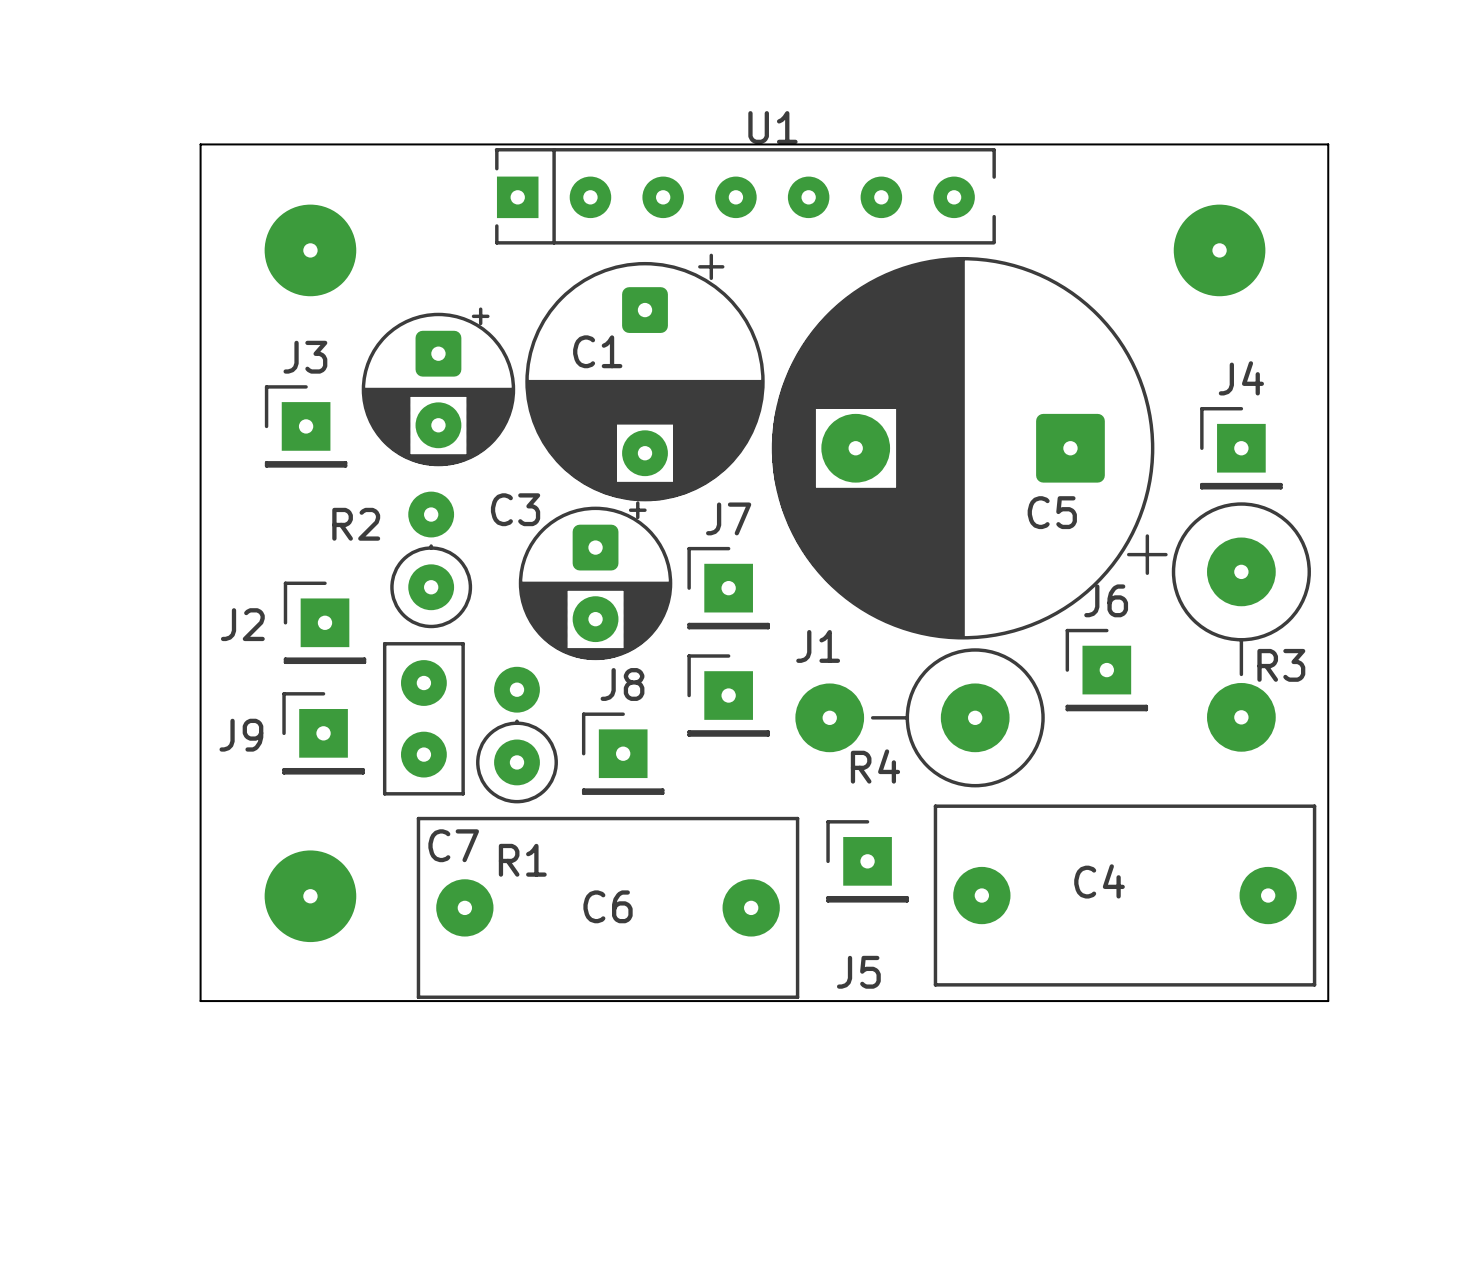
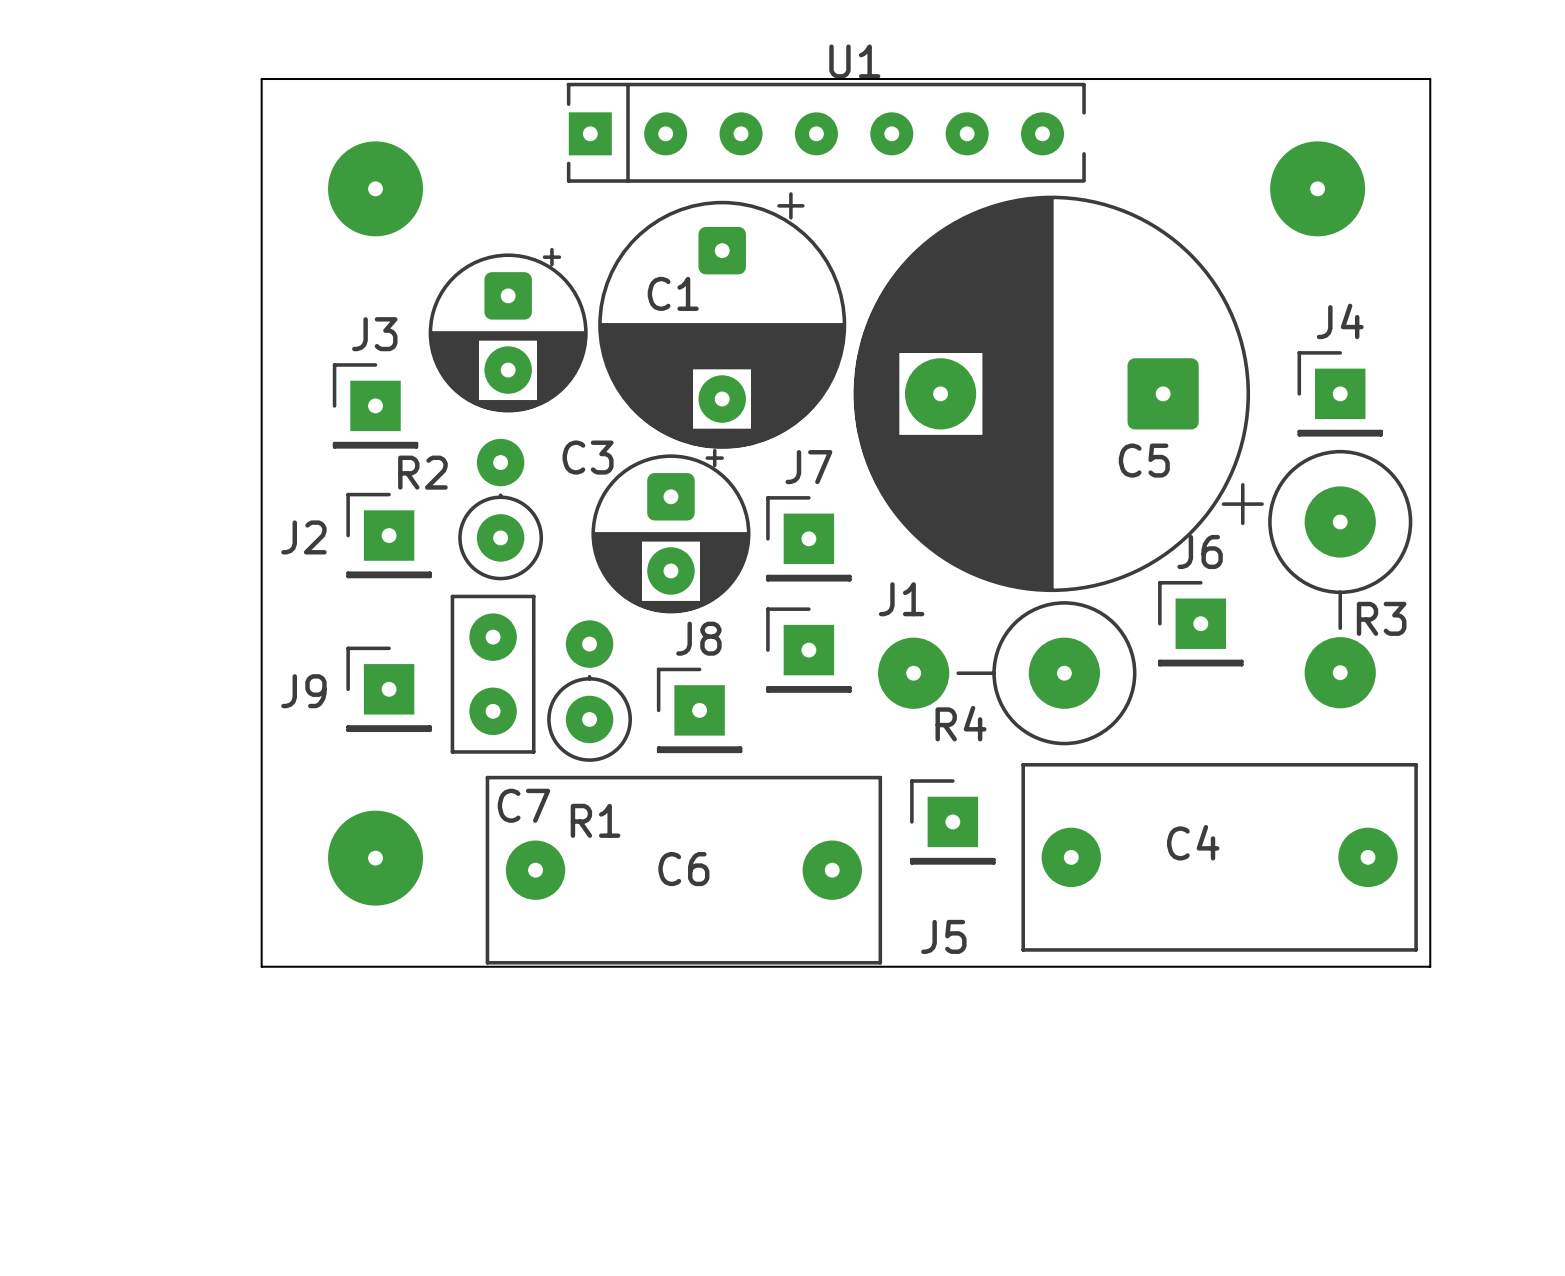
J3 position: (306, 426) -> (375, 405)
J2 position: (324, 622) -> (389, 535)

